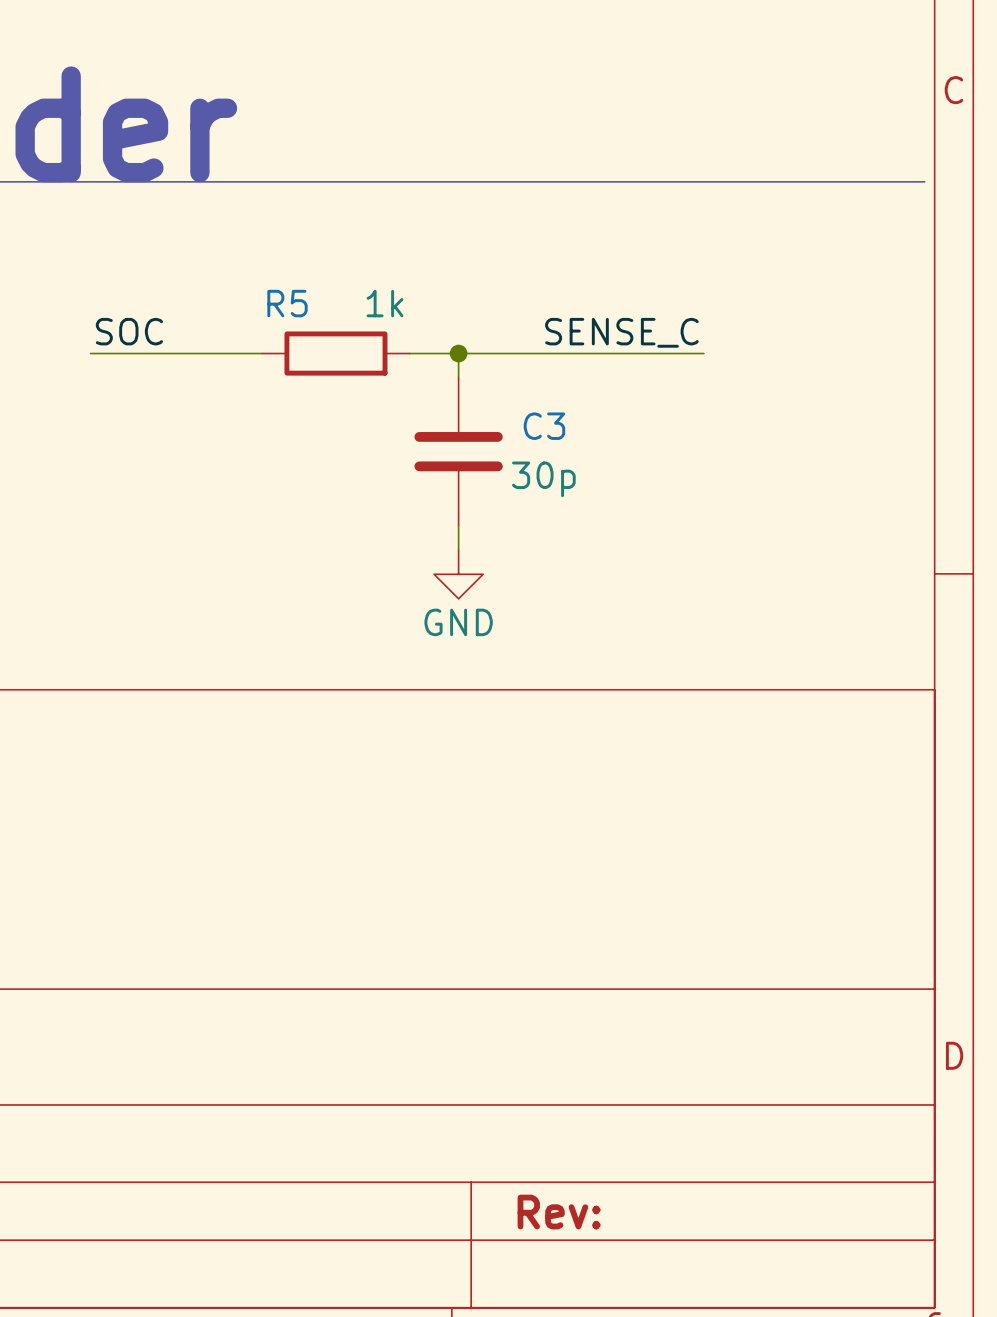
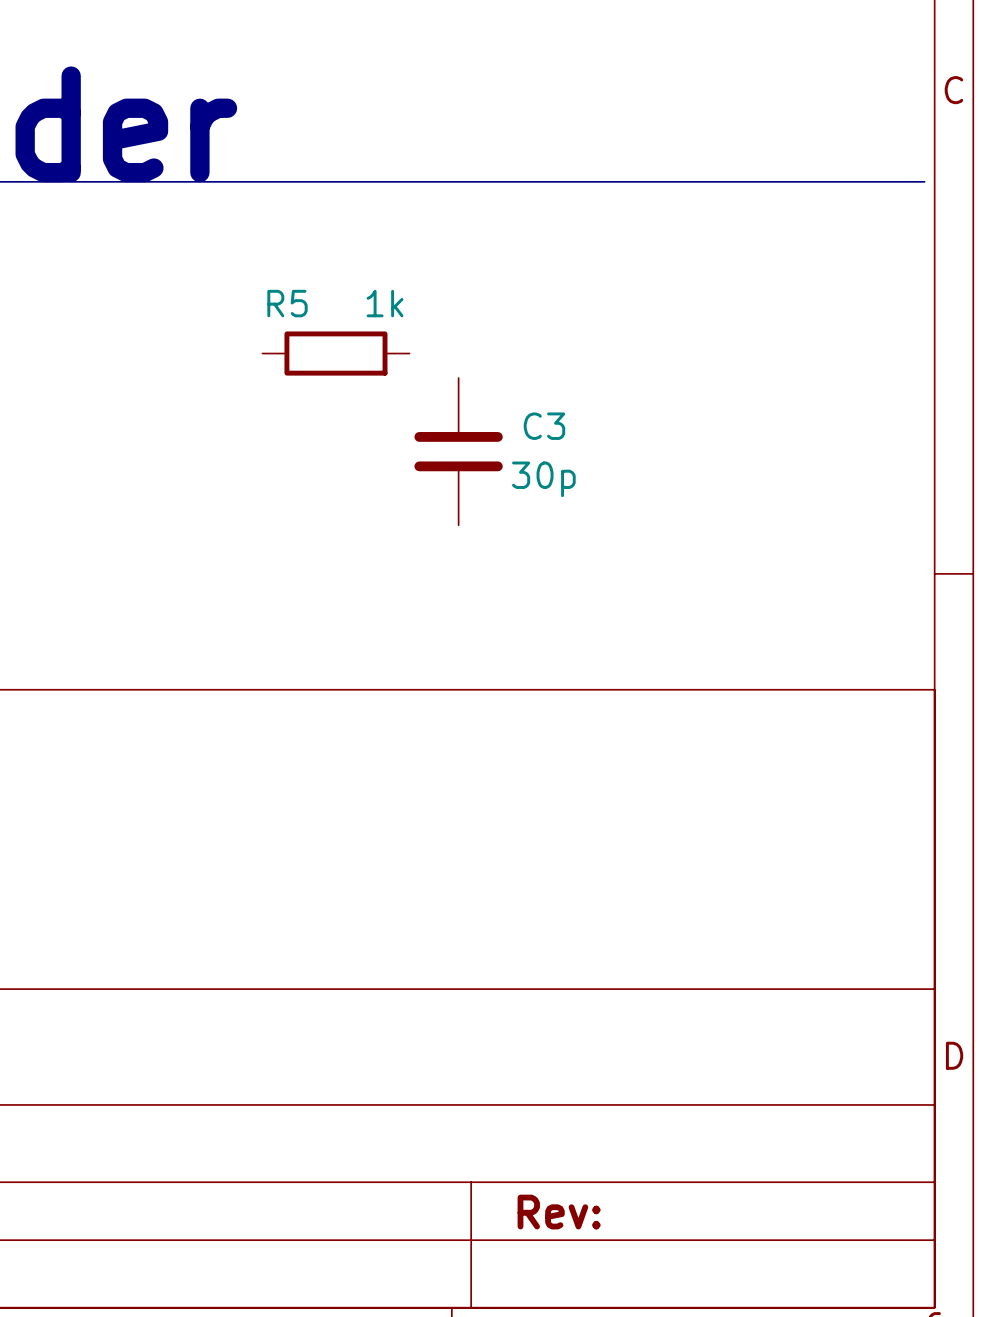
label: SOC (129, 331) -> none
label: SENSE_C (621, 332) -> none
wire: (90, 353) (262, 353) -> none
wire: (409, 353) (703, 353) -> none
wire: (458, 353) (458, 378) -> none
junction: (458, 353) -> none
wire: (458, 525) (458, 549) -> none
power symbol: GND (458, 574) -> none

